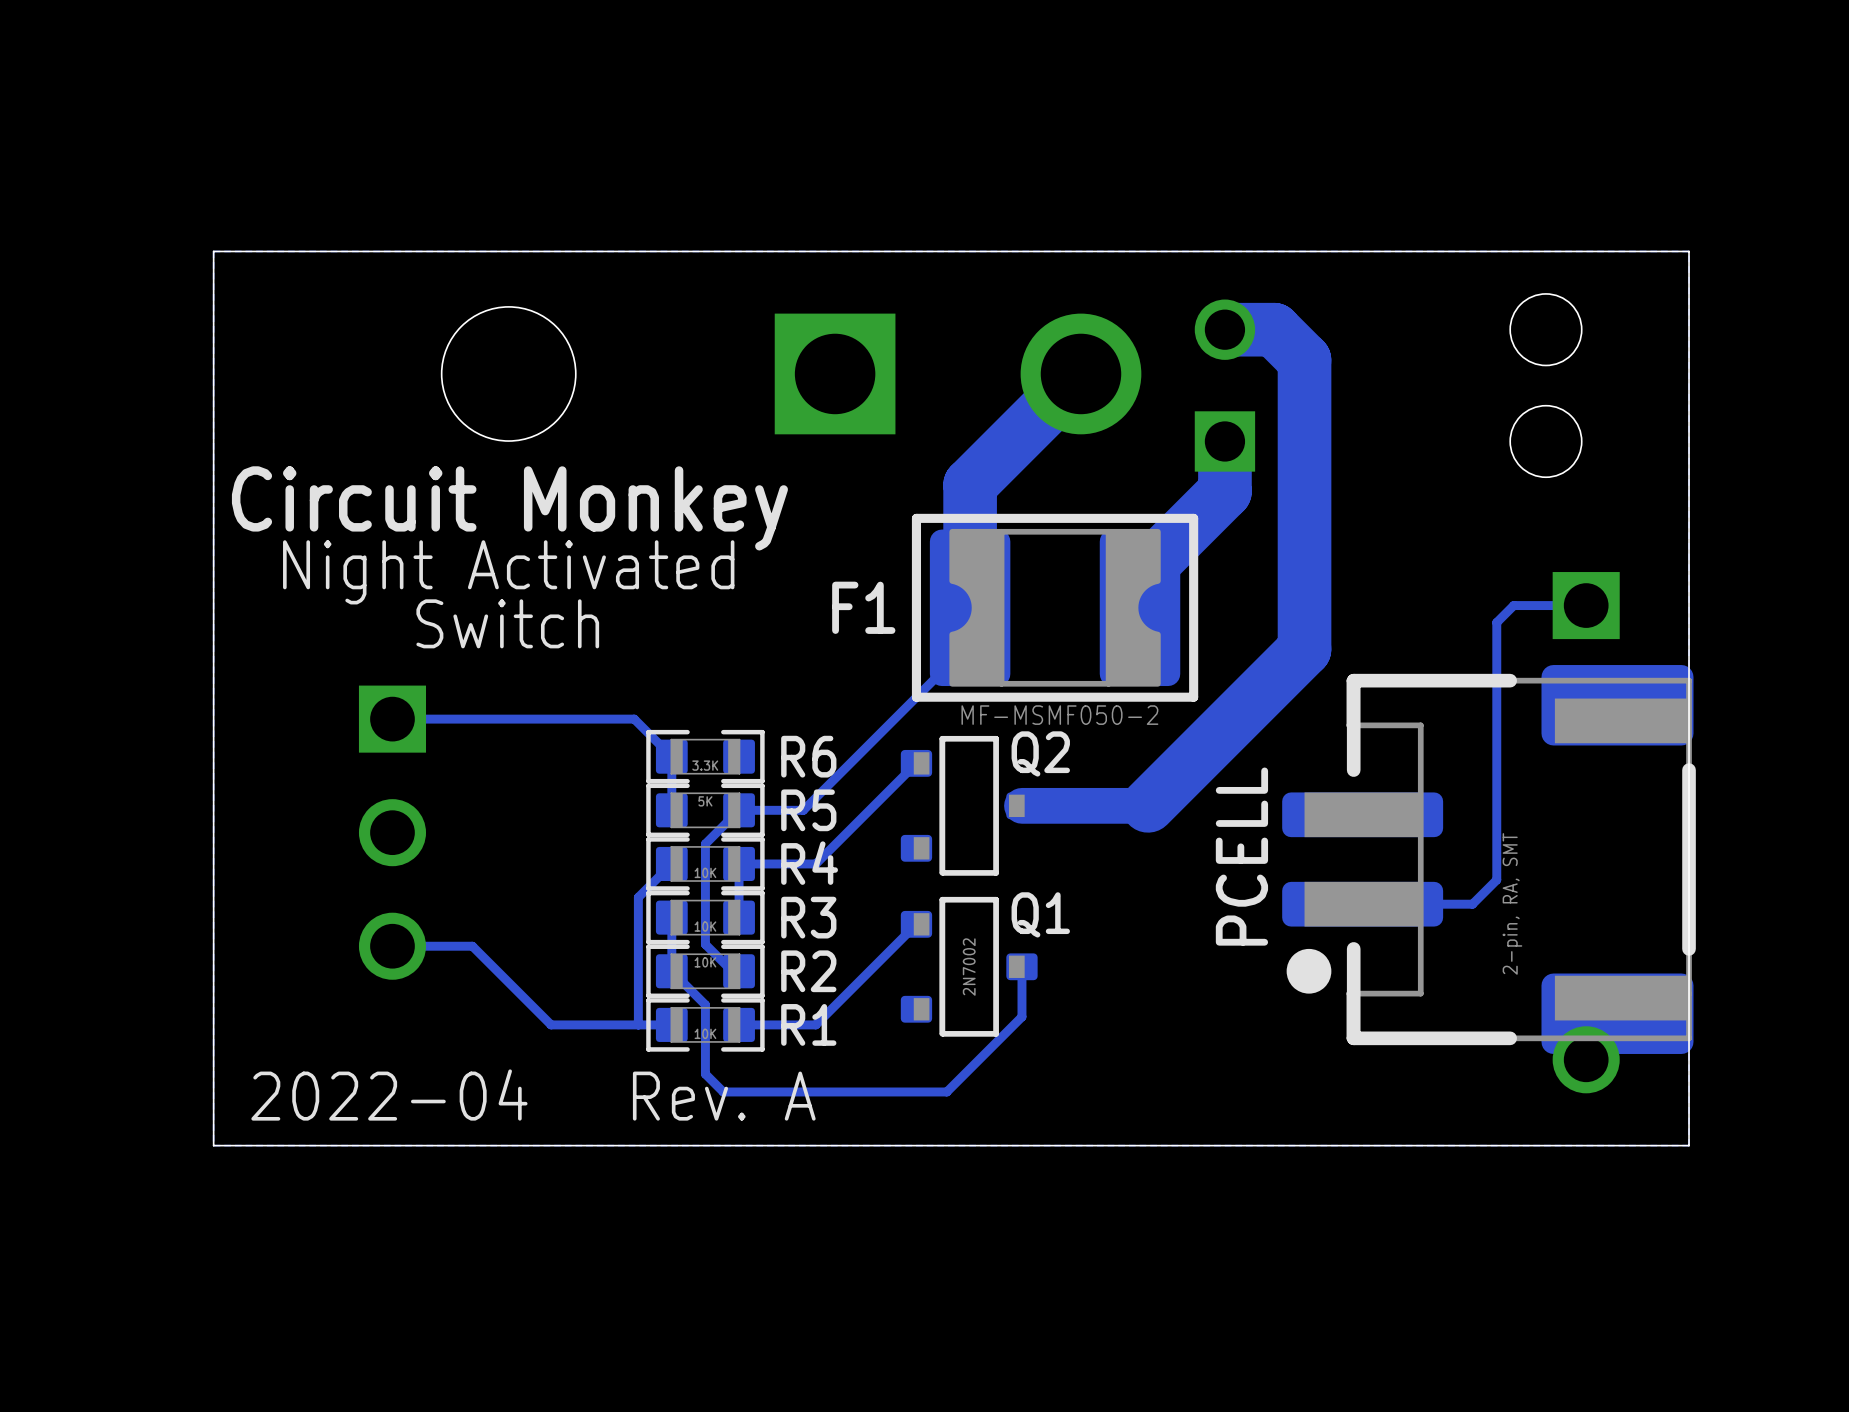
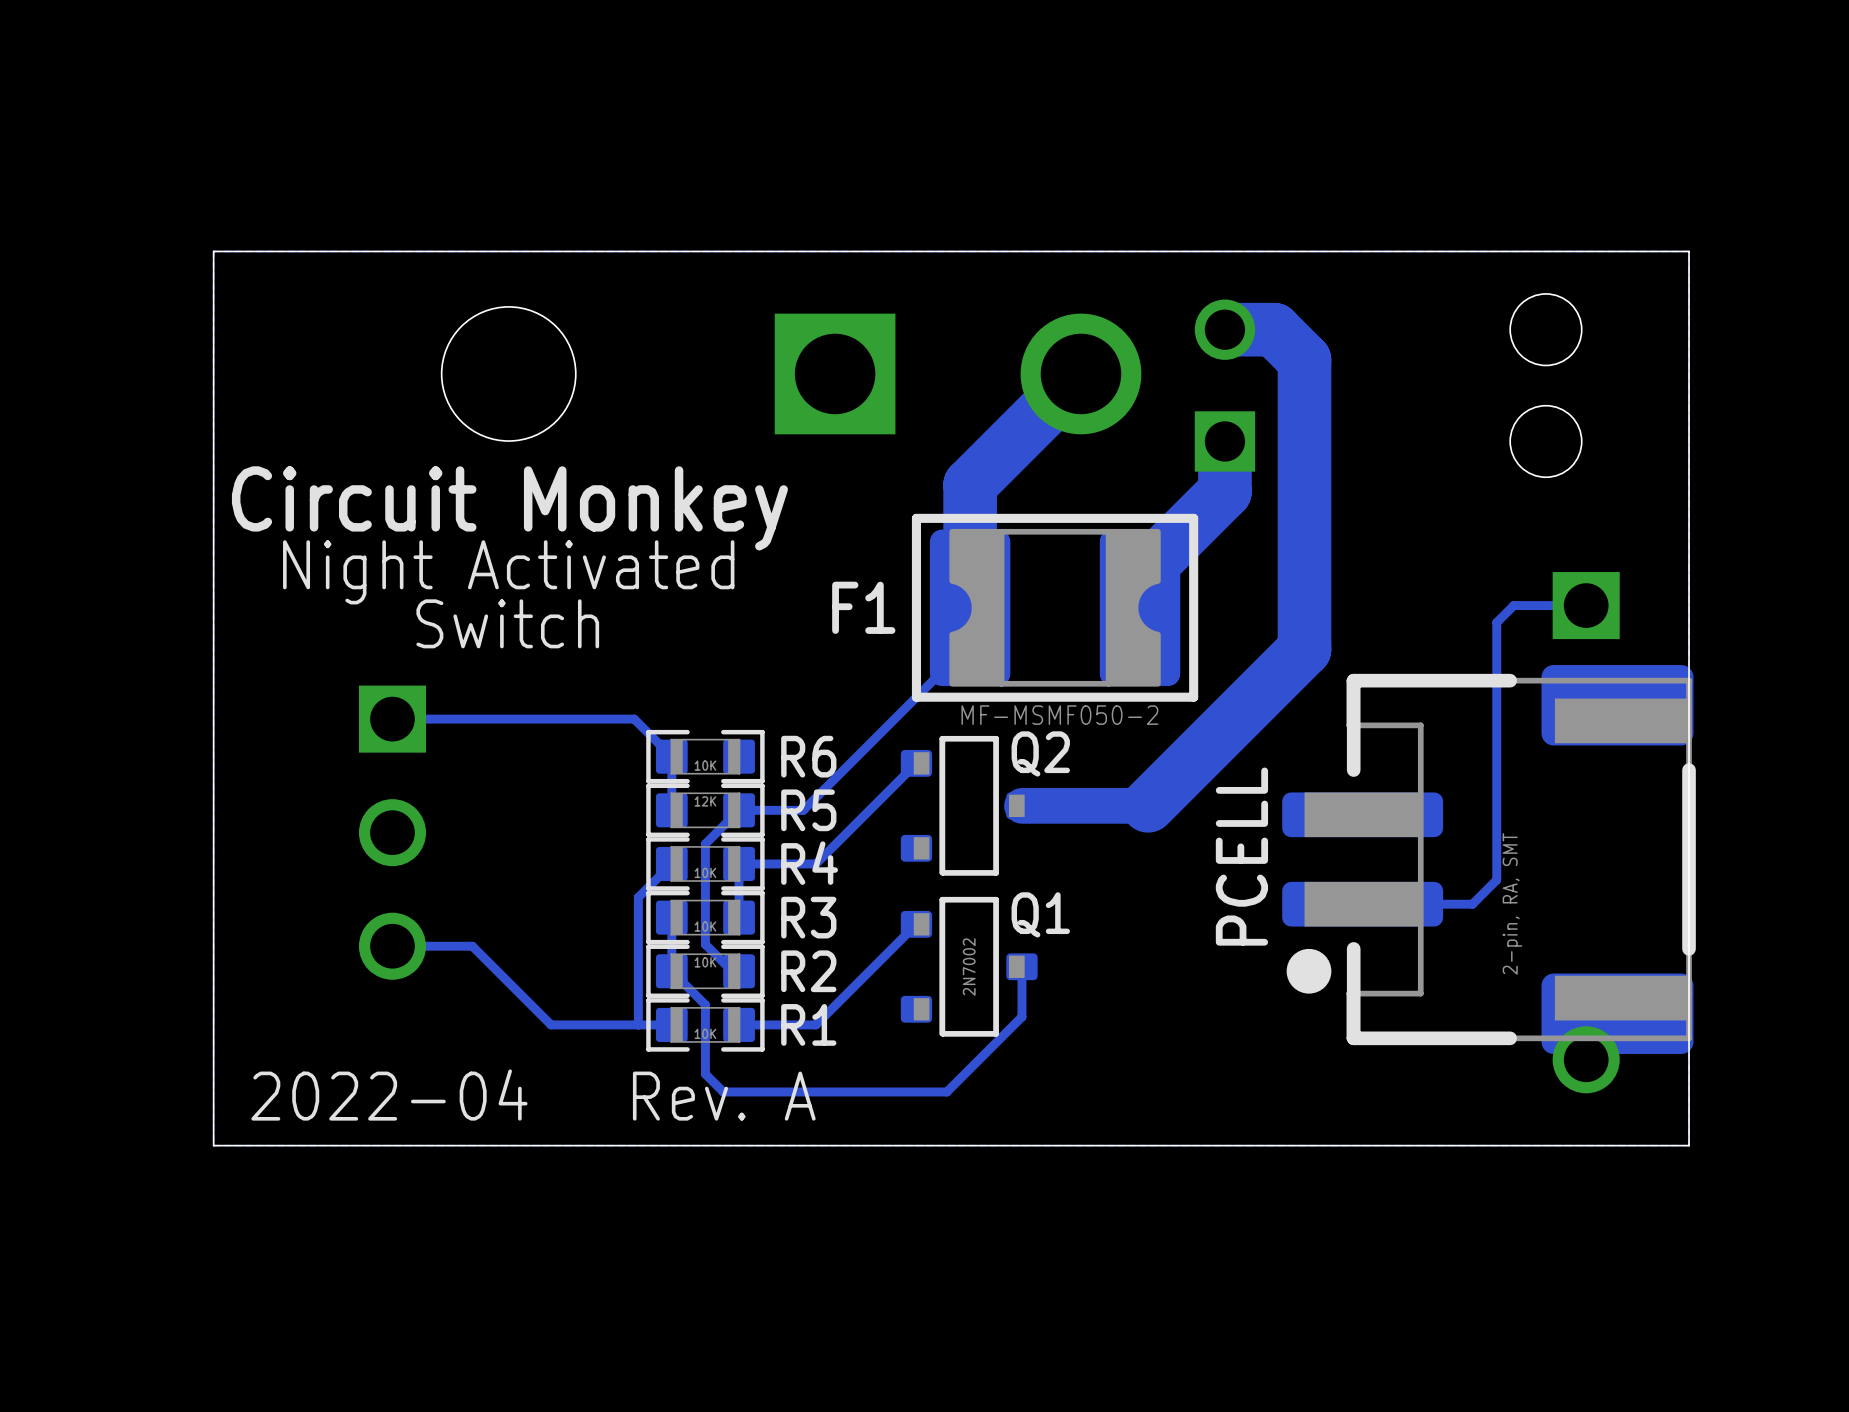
R6 value: 3.3K (705, 765) -> 10K (705, 765)
R5 value: 5K (705, 801) -> 12K (705, 801)

